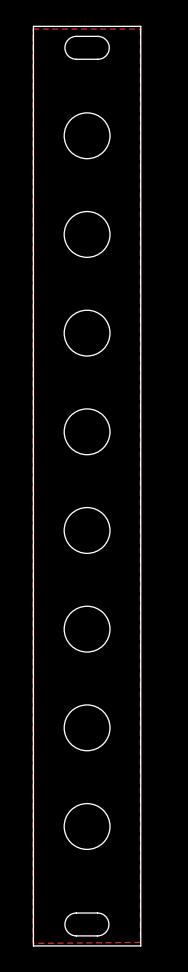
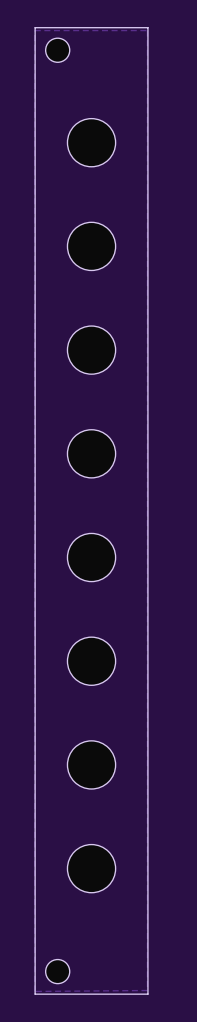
board edge: (76, 36) (103, 37) (108, 44) (107, 53) (99, 59) (70, 57) (65, 52) (65, 44) (69, 38) (76, 36) -> none
part: none -> (57, 50)
board edge: (76, 913) (102, 914) (108, 921) (107, 929) (98, 935) (70, 934) (65, 928) (65, 921) (69, 915) (76, 913) -> none
part: none -> (57, 971)

